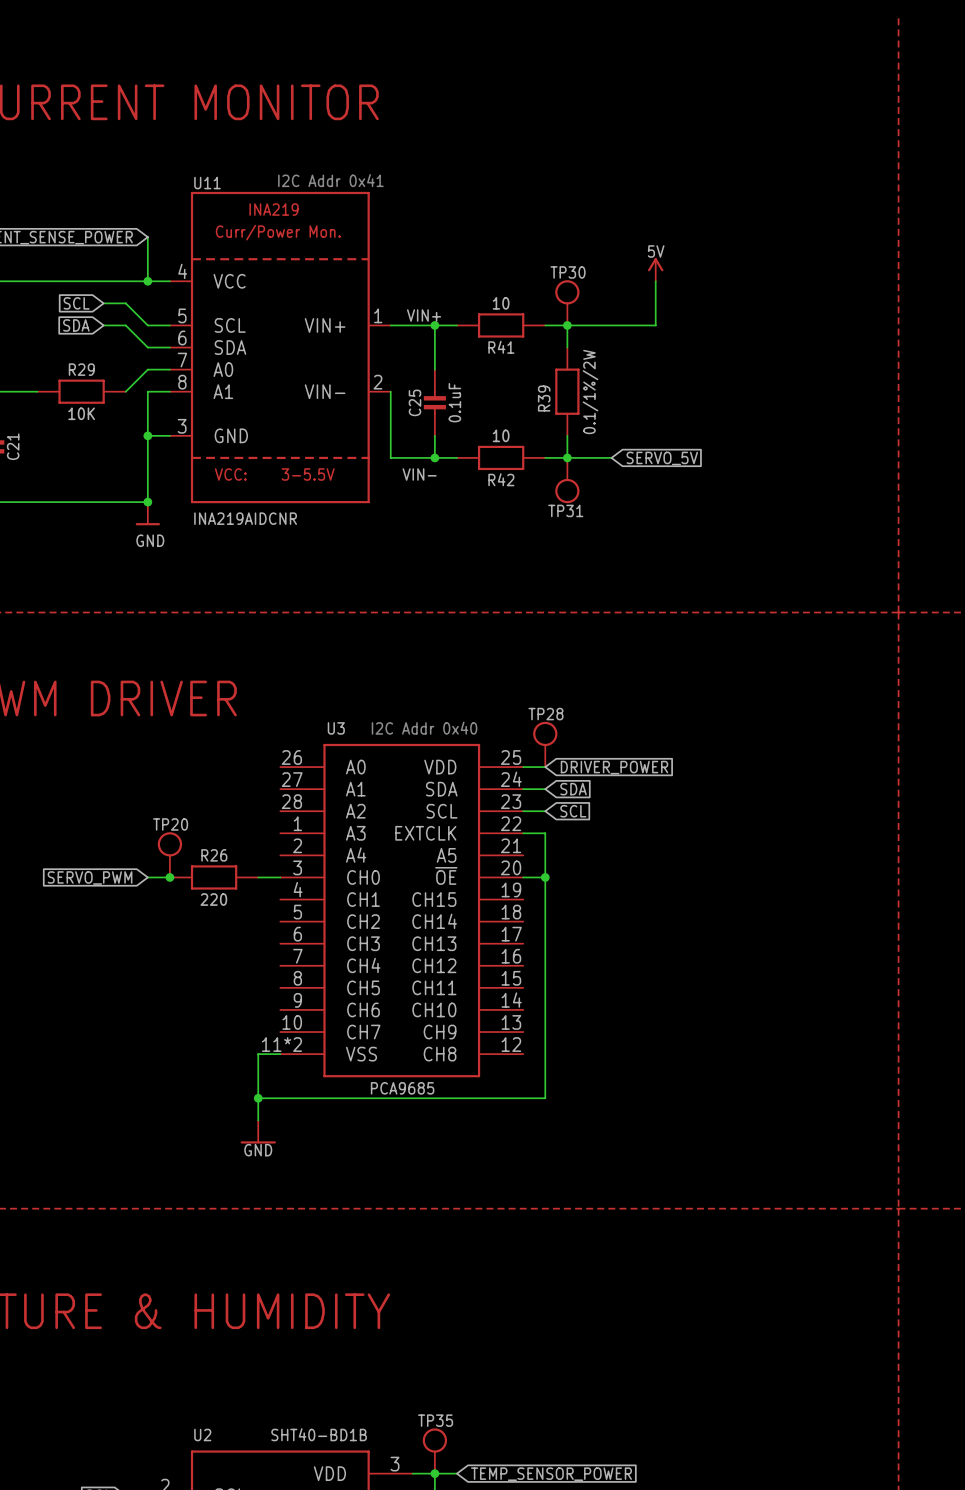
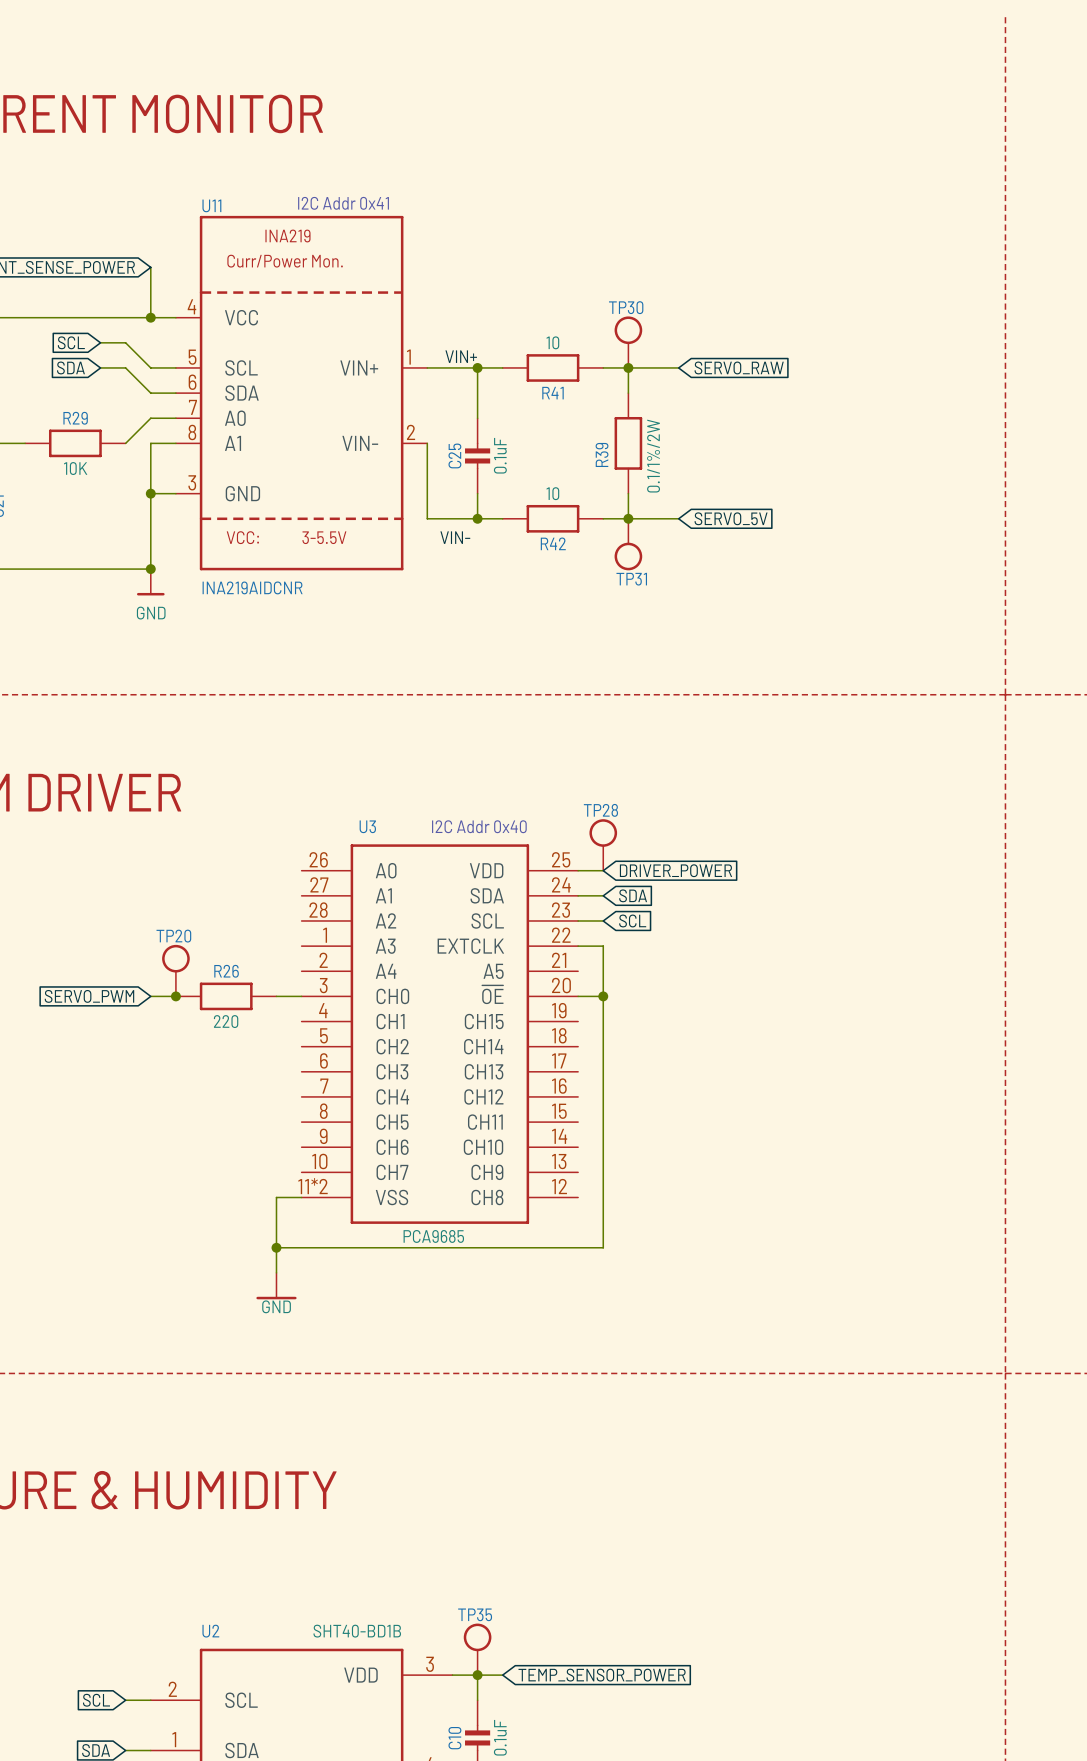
power symbol: 5V (655, 269) -> none
wire: (655, 281) (655, 325) (611, 325) -> none
global label: none -> SERVO_RAW (739, 367)

